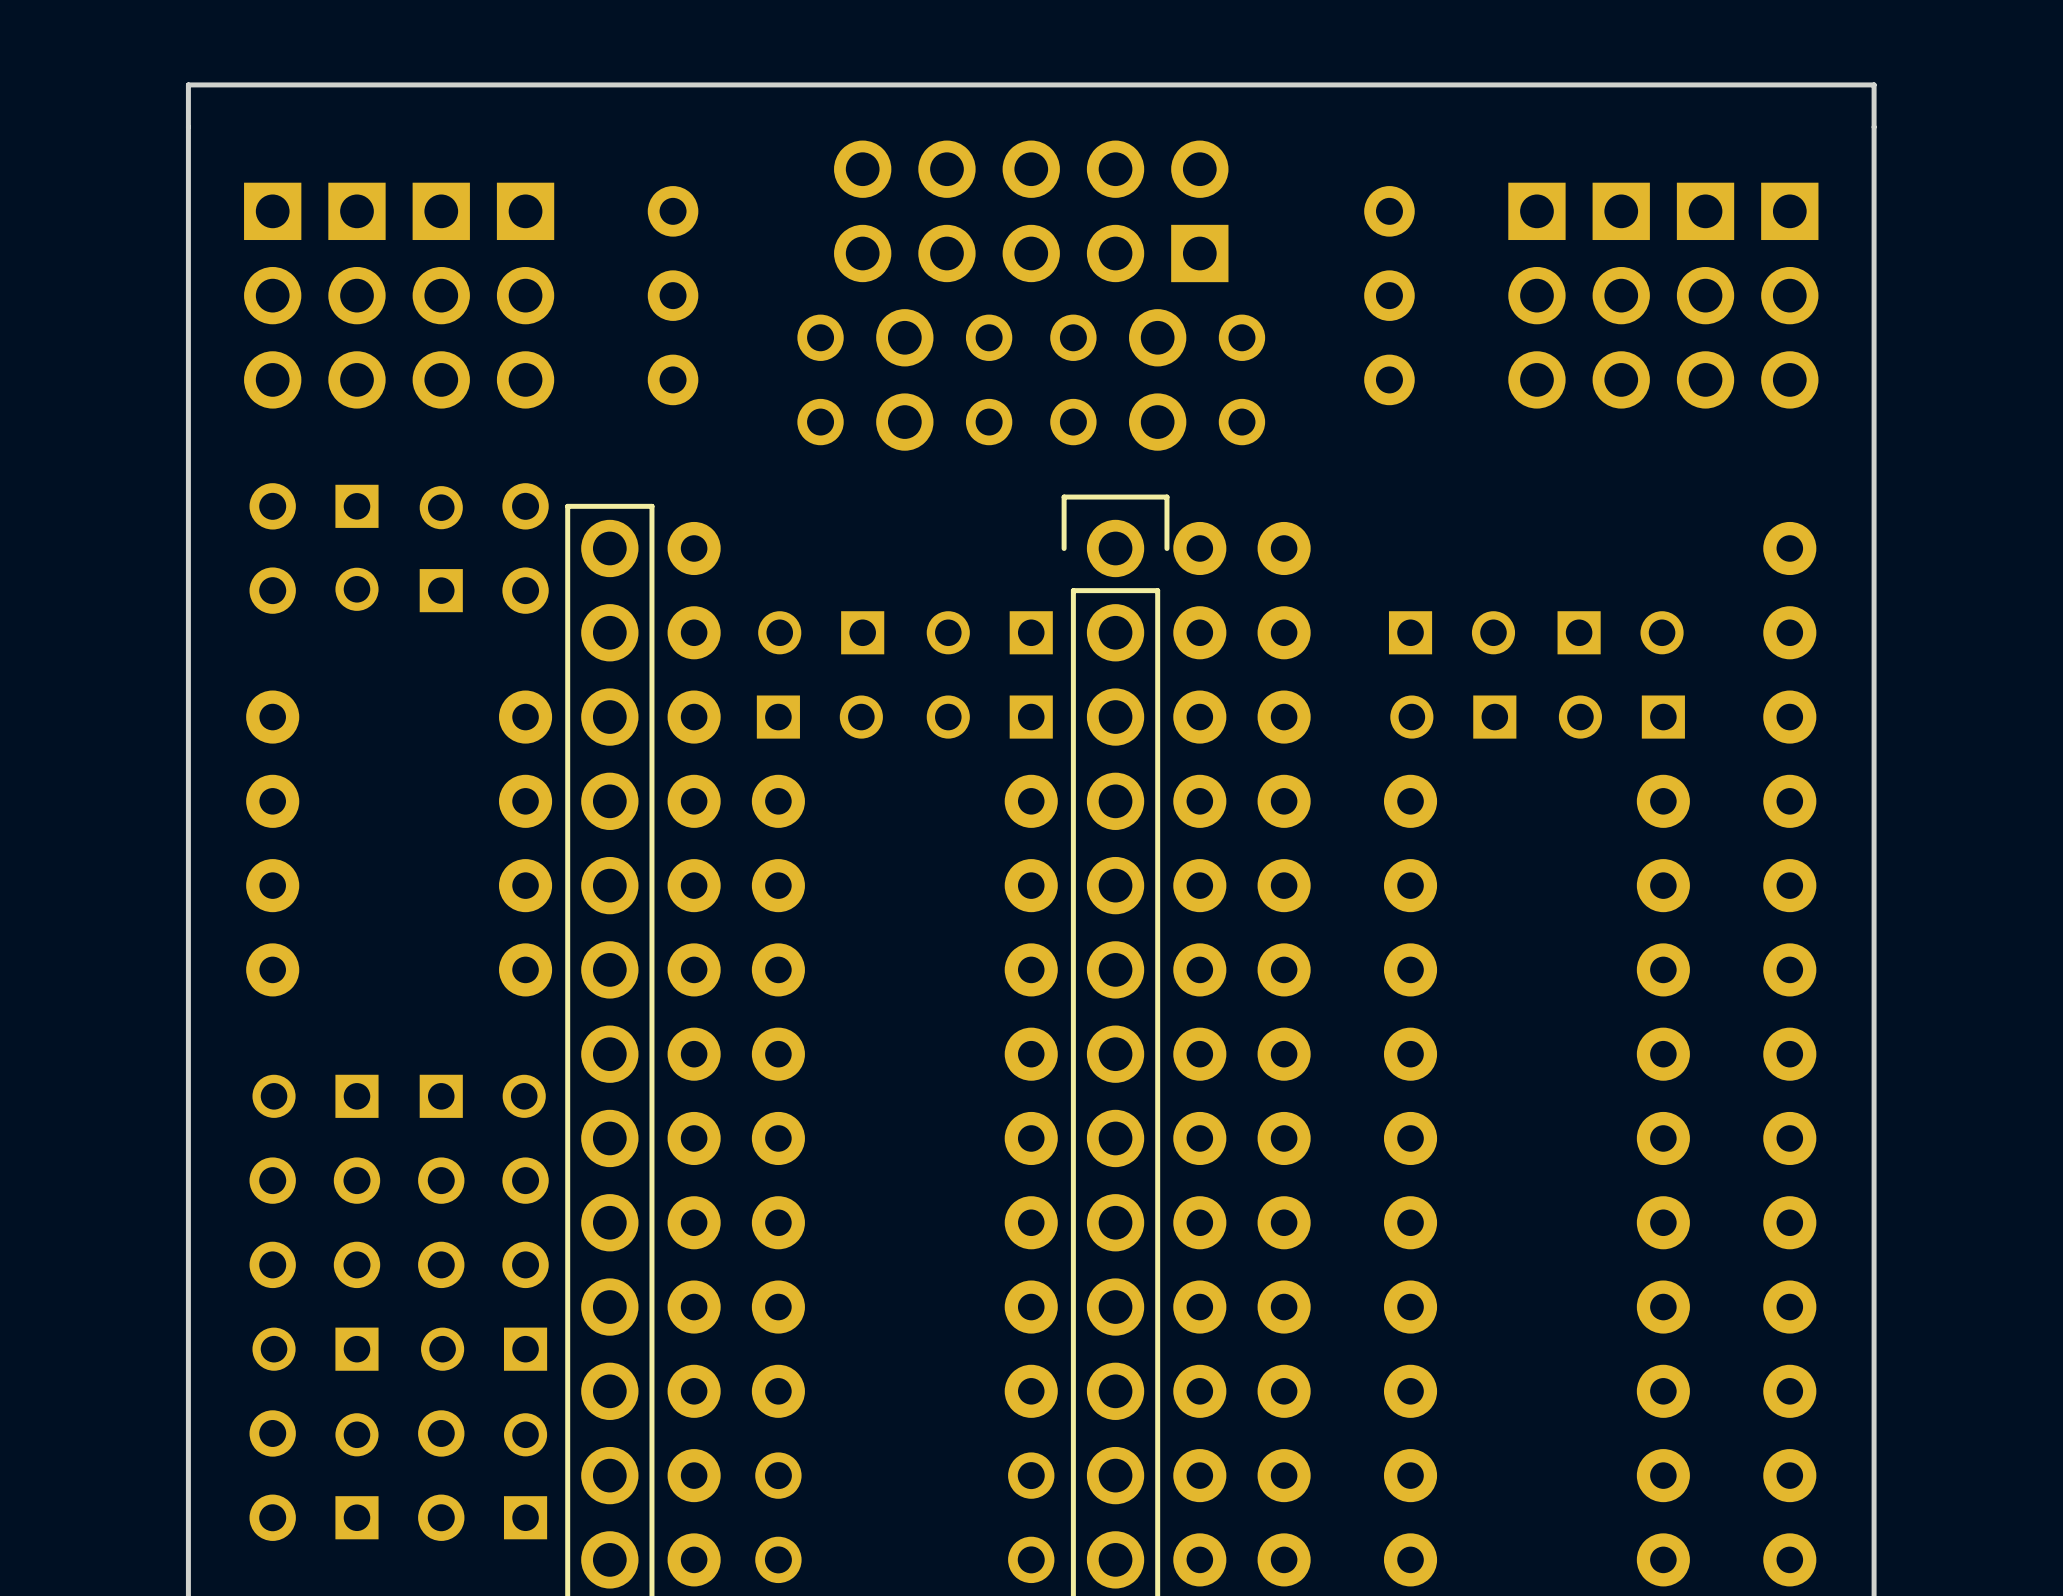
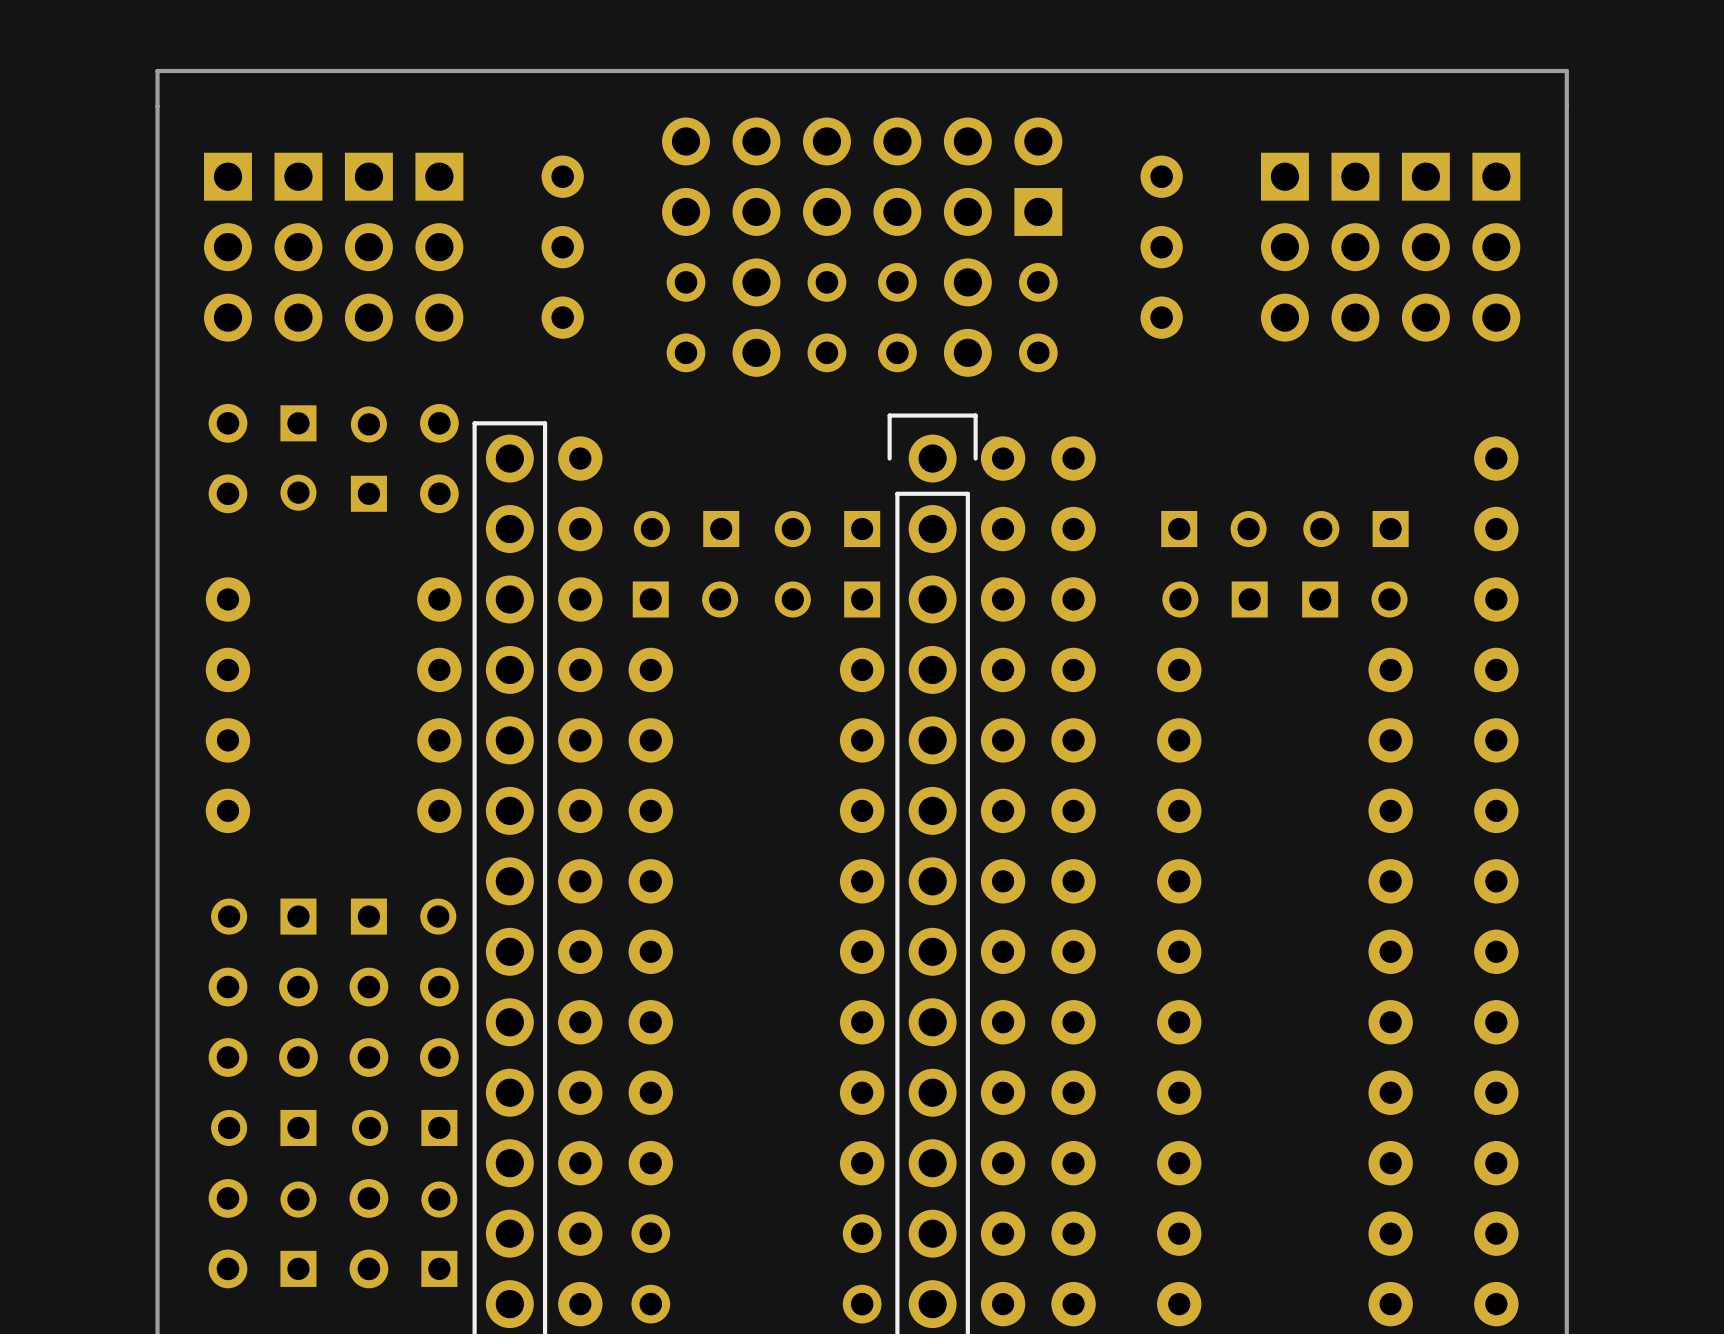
part footprint: [834, 140, 1229, 283] -> [662, 117, 1063, 236]
part rotation: 0° (1620, 632) -> 180° (1355, 529)
part rotation: 0° (1621, 717) -> 180° (1354, 599)

